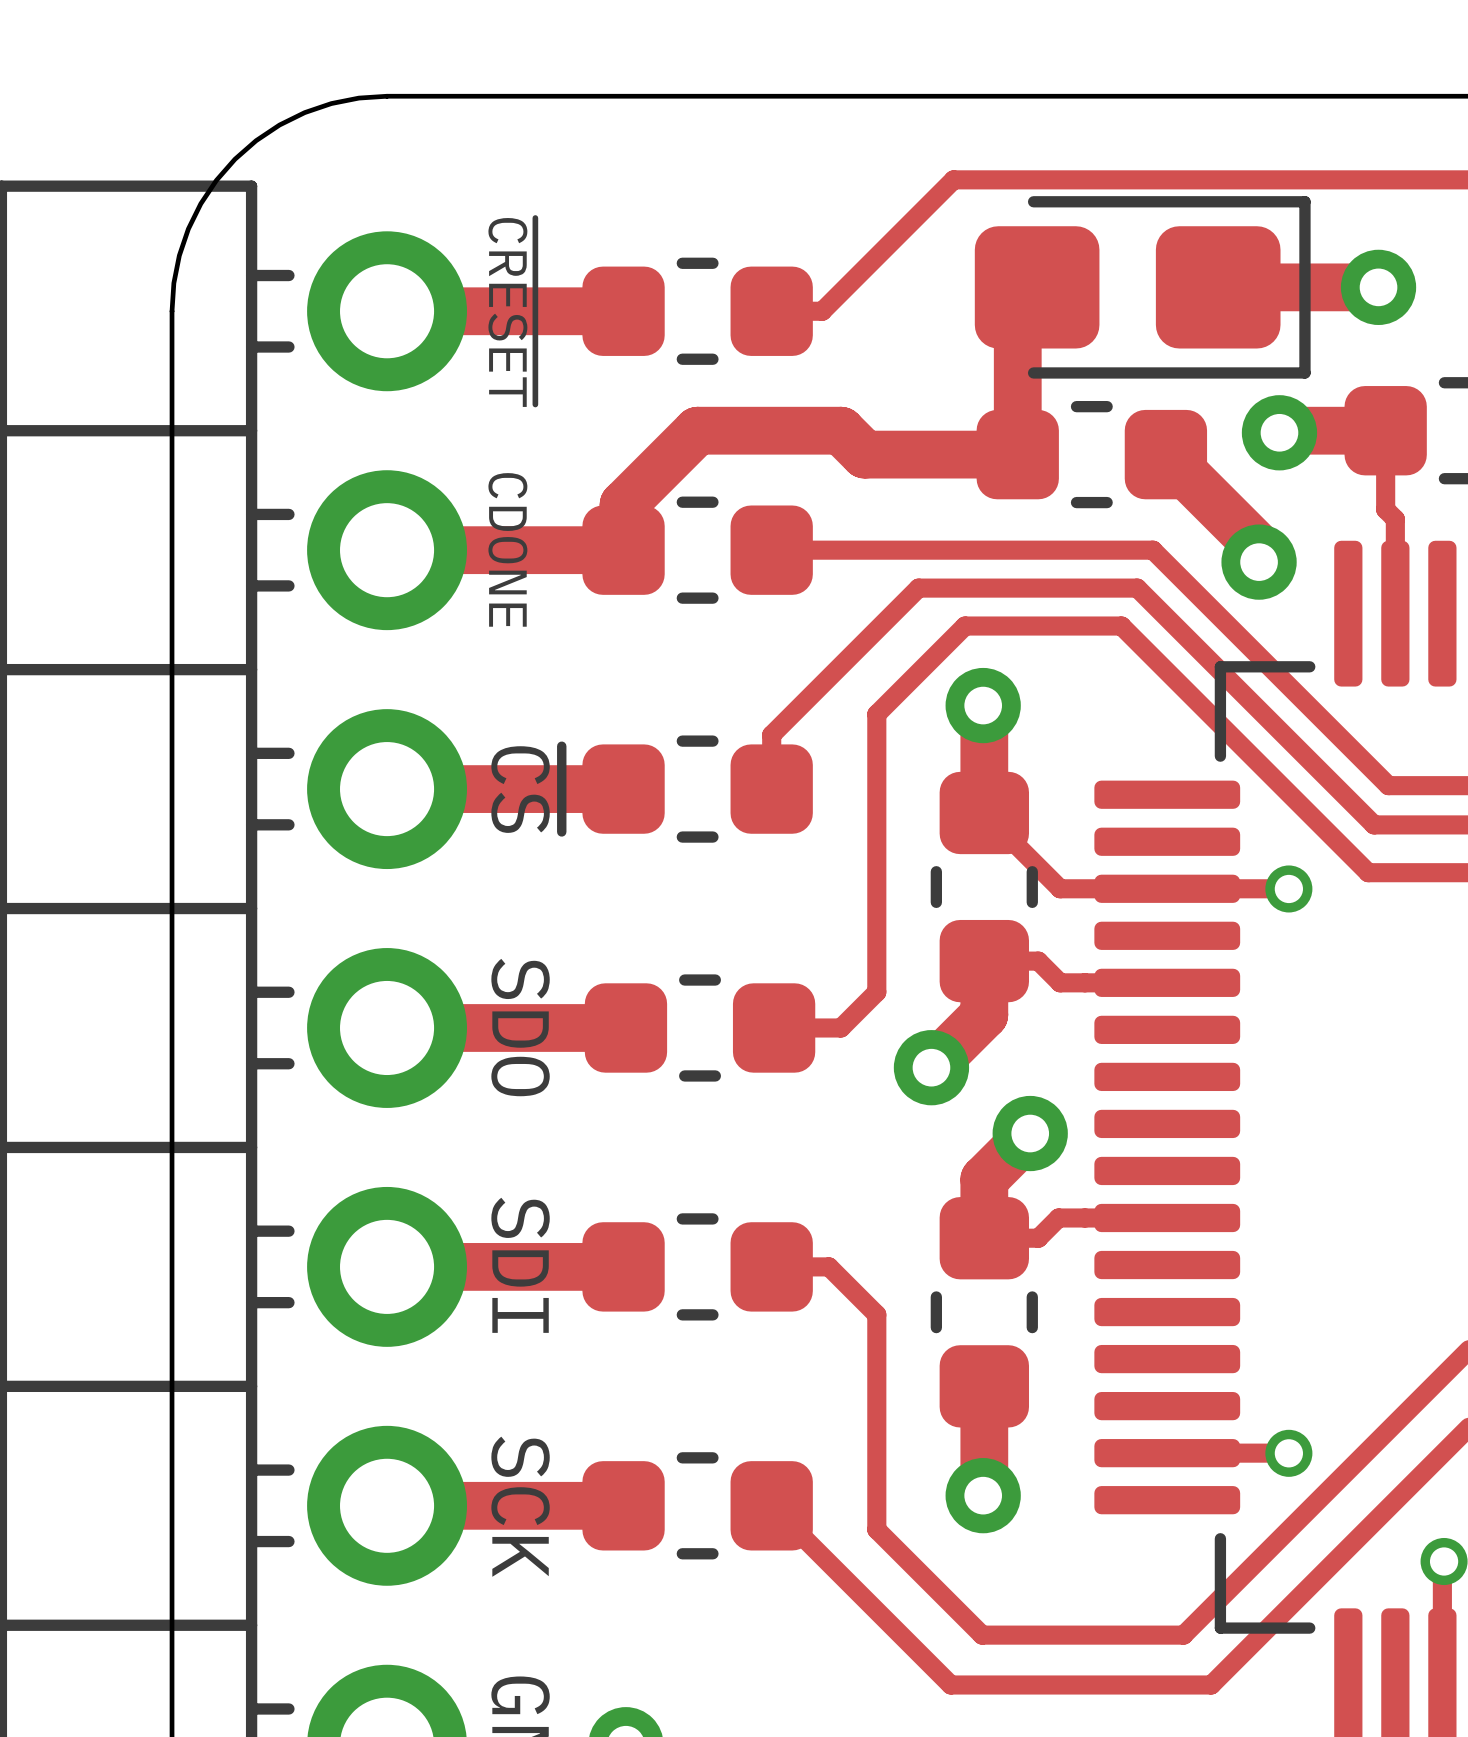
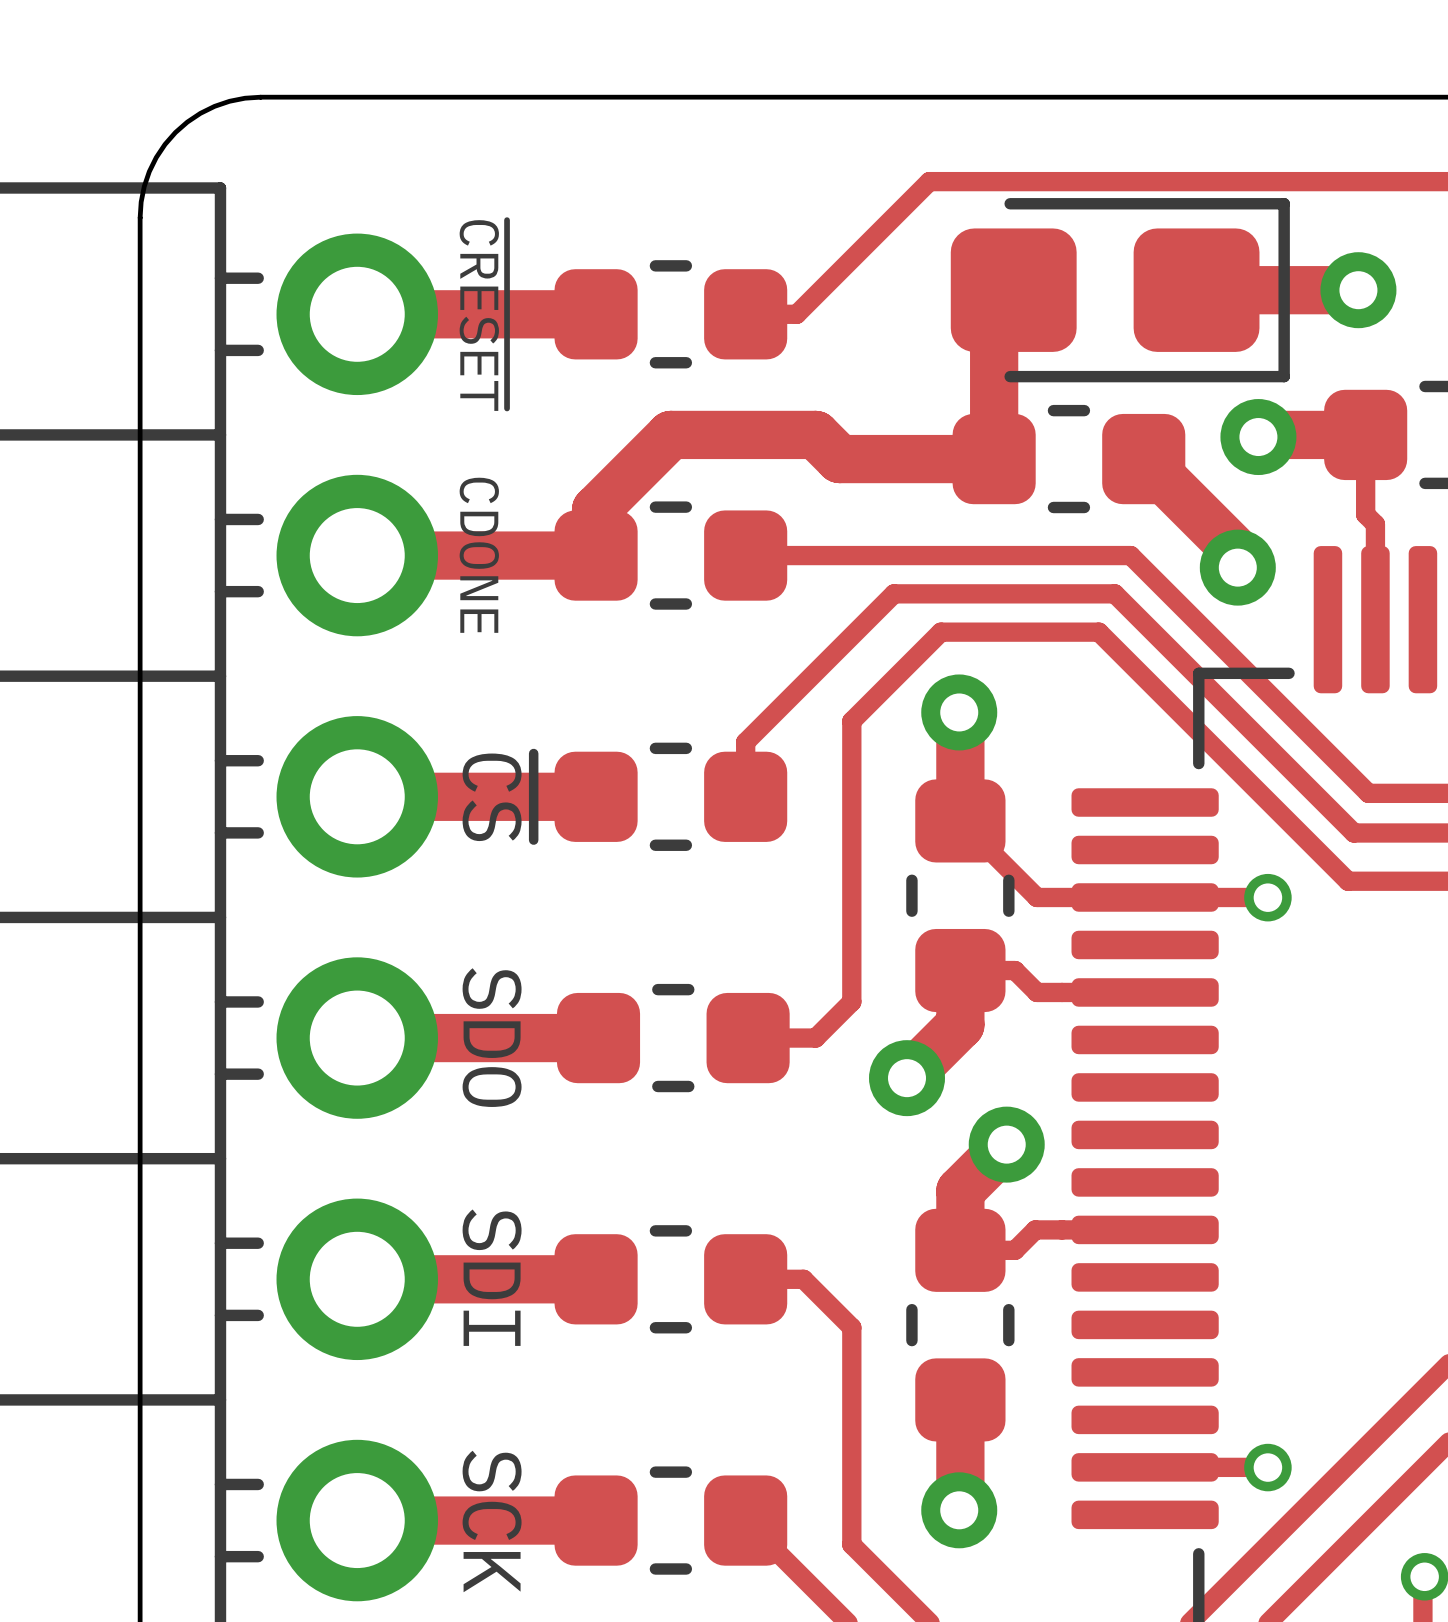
board edge: (387, 96) (358, 98) (331, 103) (304, 112) (279, 125) (256, 140) (235, 159) (216, 180) (200, 203) (188, 228) (179, 255) (173, 283) (172, 311) -> (357, 97) (245, 98) (214, 106) (187, 122) (175, 132) (156, 157) (149, 171) (141, 202) (140, 314)

